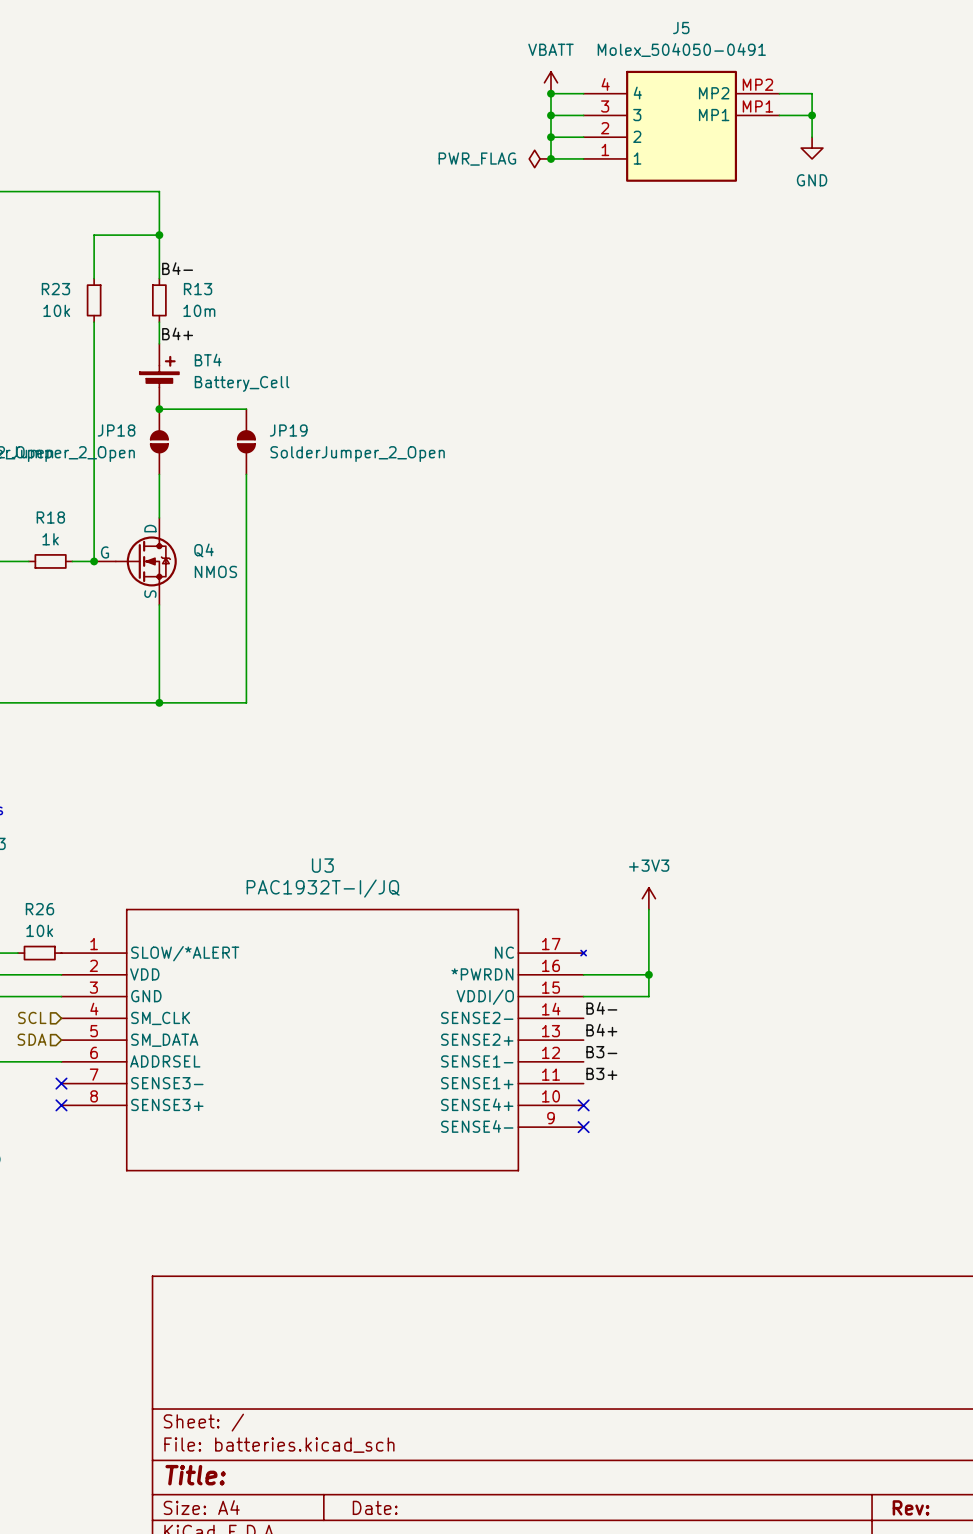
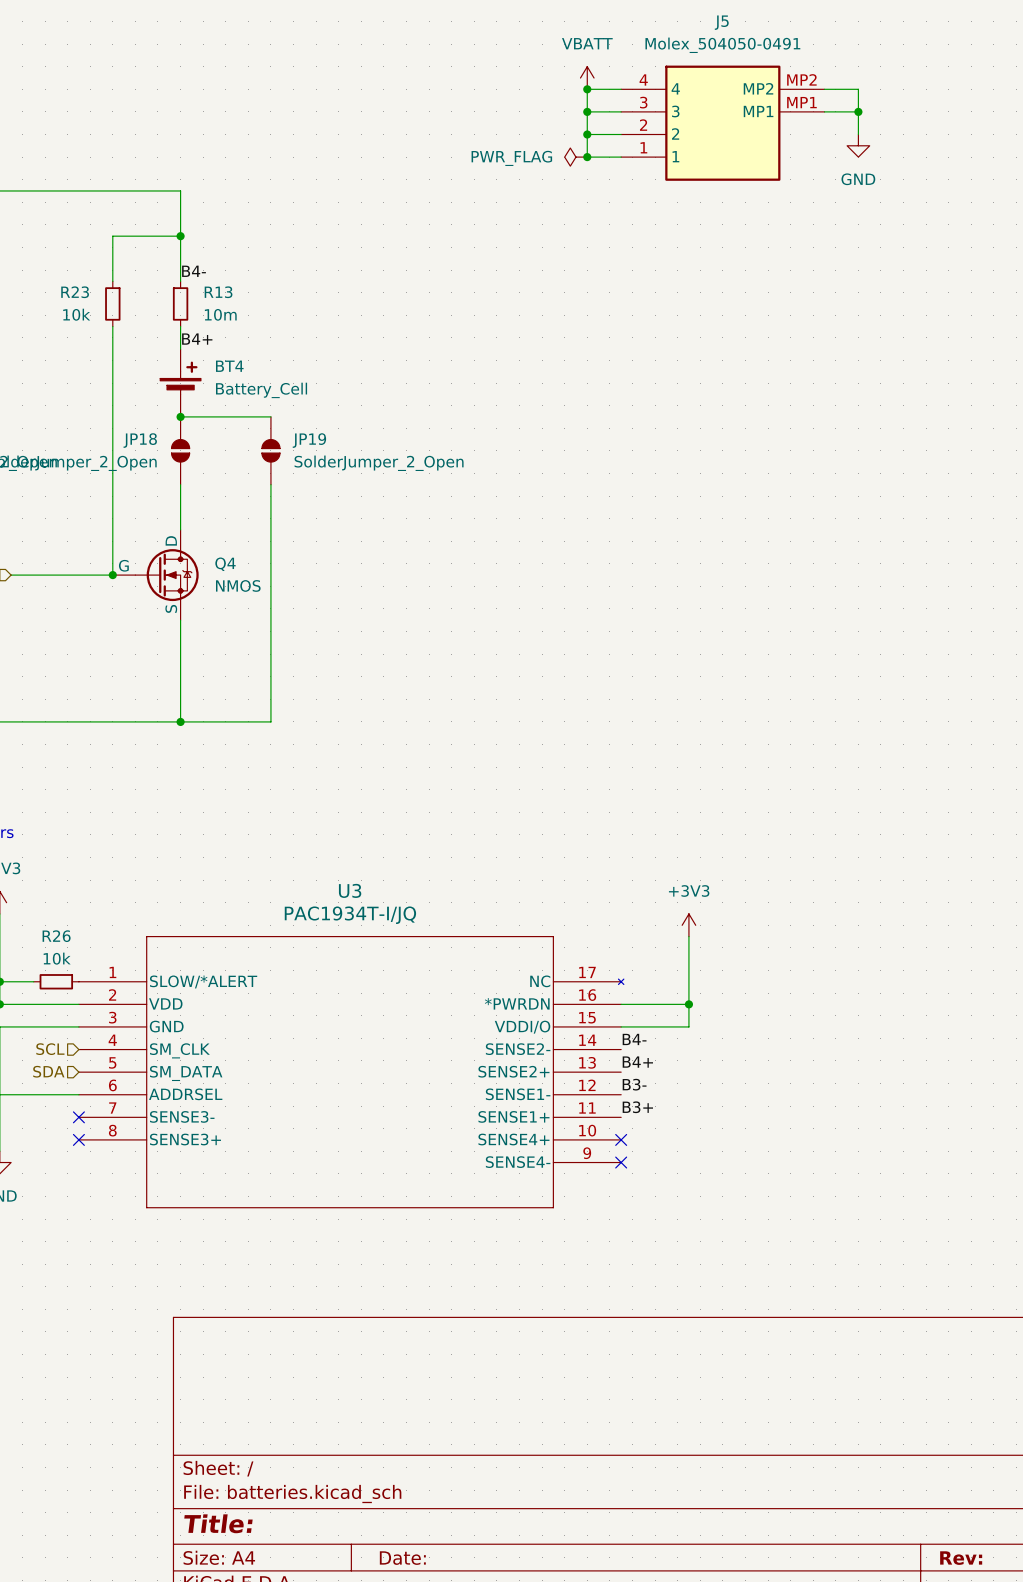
wire: none -> (45, 575) (90, 575)
R18: 1k (50, 561) -> none
U3 value: PAC1932T-I/JQ (323, 888) -> PAC1934T-I/JQ (350, 915)

